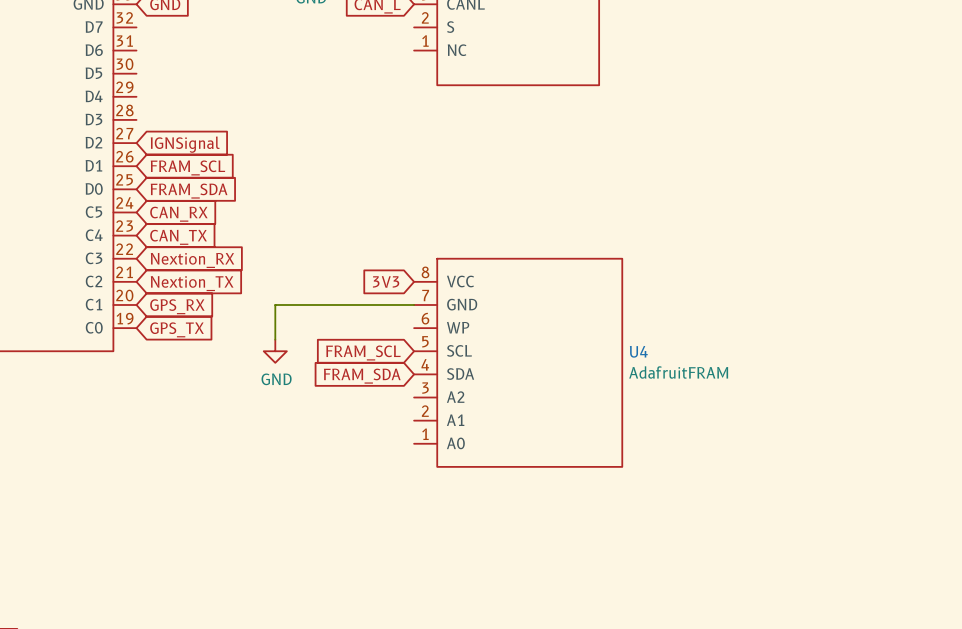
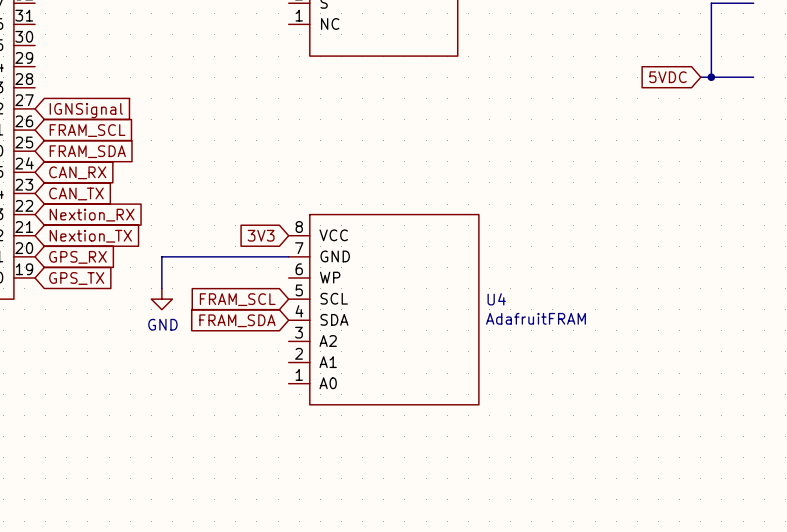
wire: none -> (753, 3) (711, 3) (711, 77)
global label: none -> 5VDC (667, 77)
wire: none -> (700, 77) (753, 77)
junction: none -> (711, 77)

